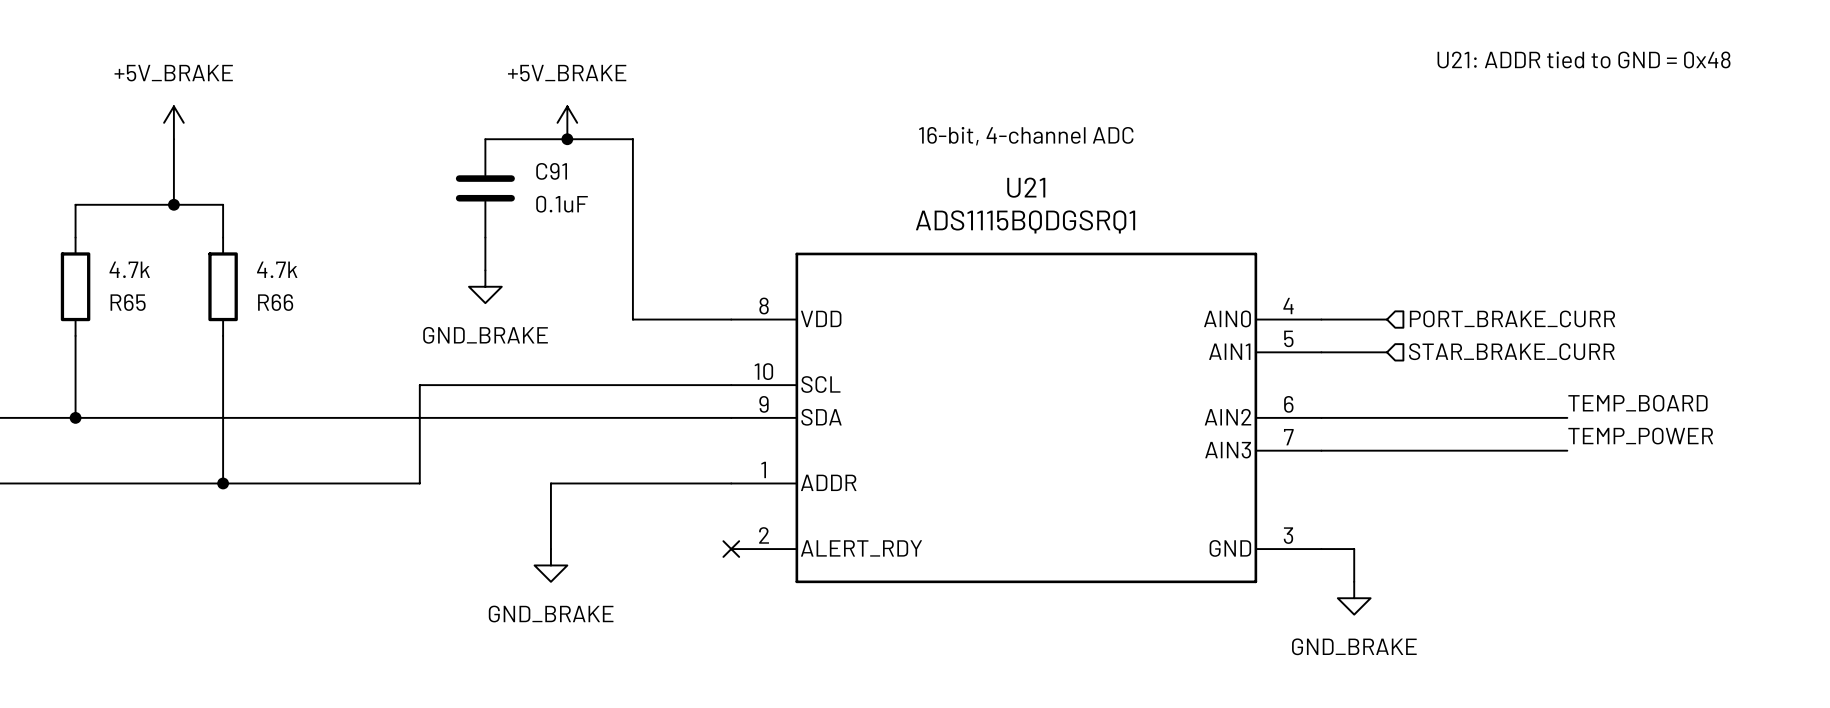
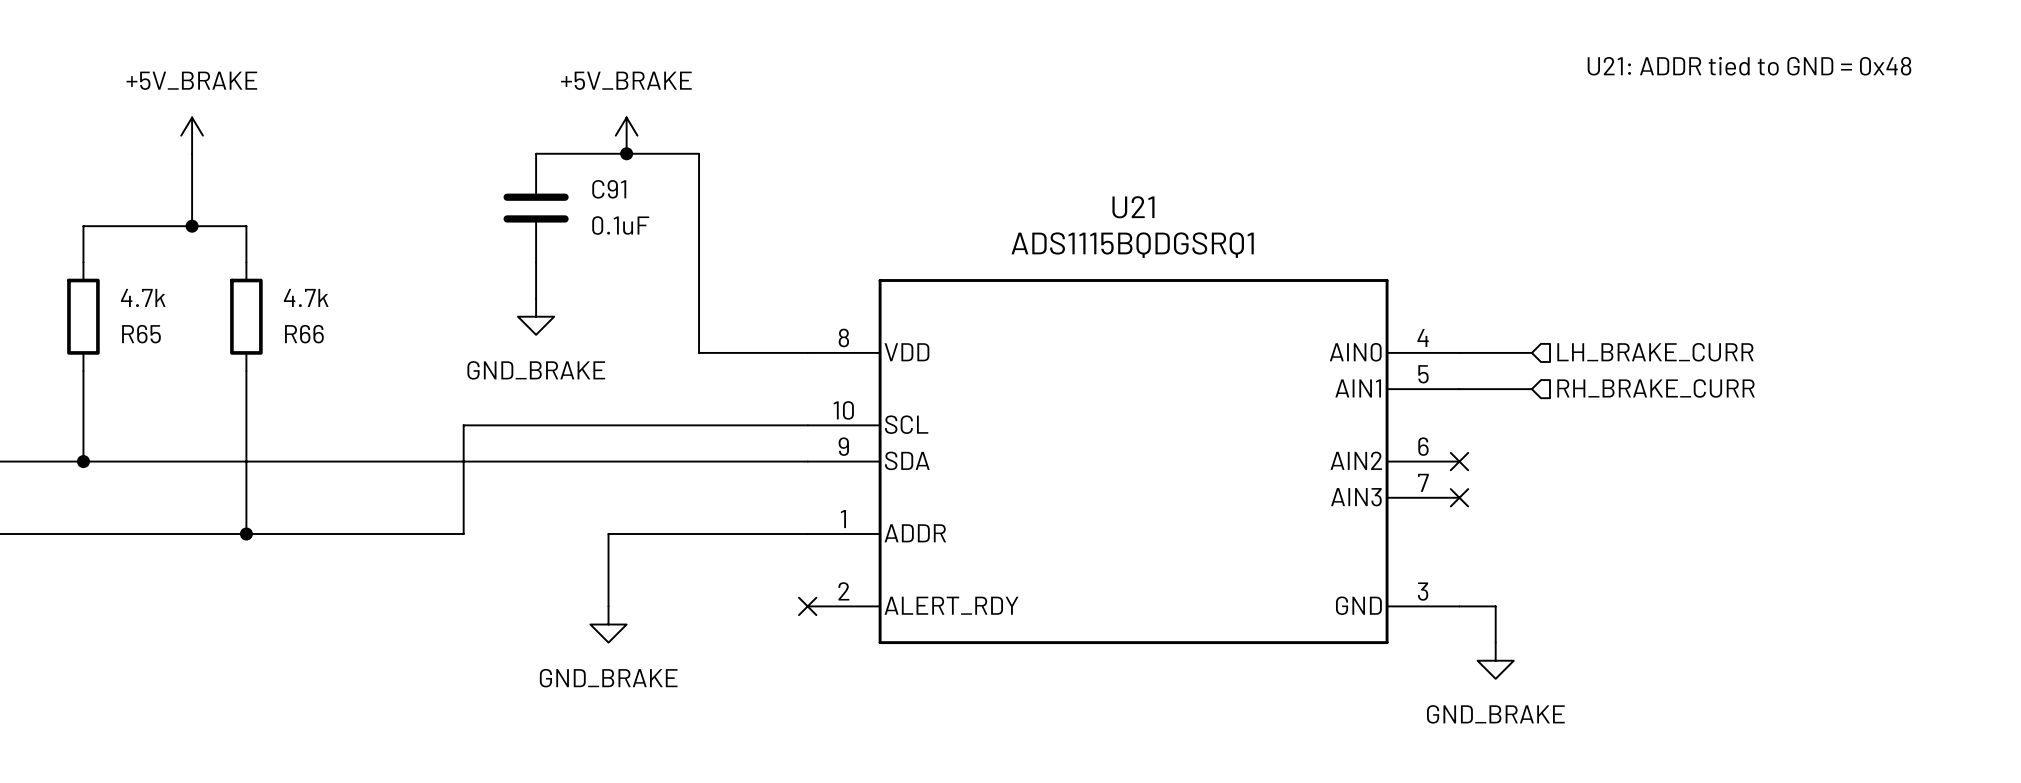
text: 16-bit, 4-channel ADC (1026, 136) -> none
hierarchical label: PORT_BRAKE_CURR (1512, 318) -> LH_BRAKE_CURR (1655, 352)
hierarchical label: STAR_BRAKE_CURR (1511, 351) -> RH_BRAKE_CURR (1656, 388)
label: TEMP_BOARD (1637, 403) -> none
wire: (1321, 417) (1567, 417) -> none
no-connect mark: none -> (1459, 461)
label: TEMP_POWER (1640, 436) -> none
wire: (1321, 450) (1567, 450) -> none
no-connect mark: none -> (1459, 497)

